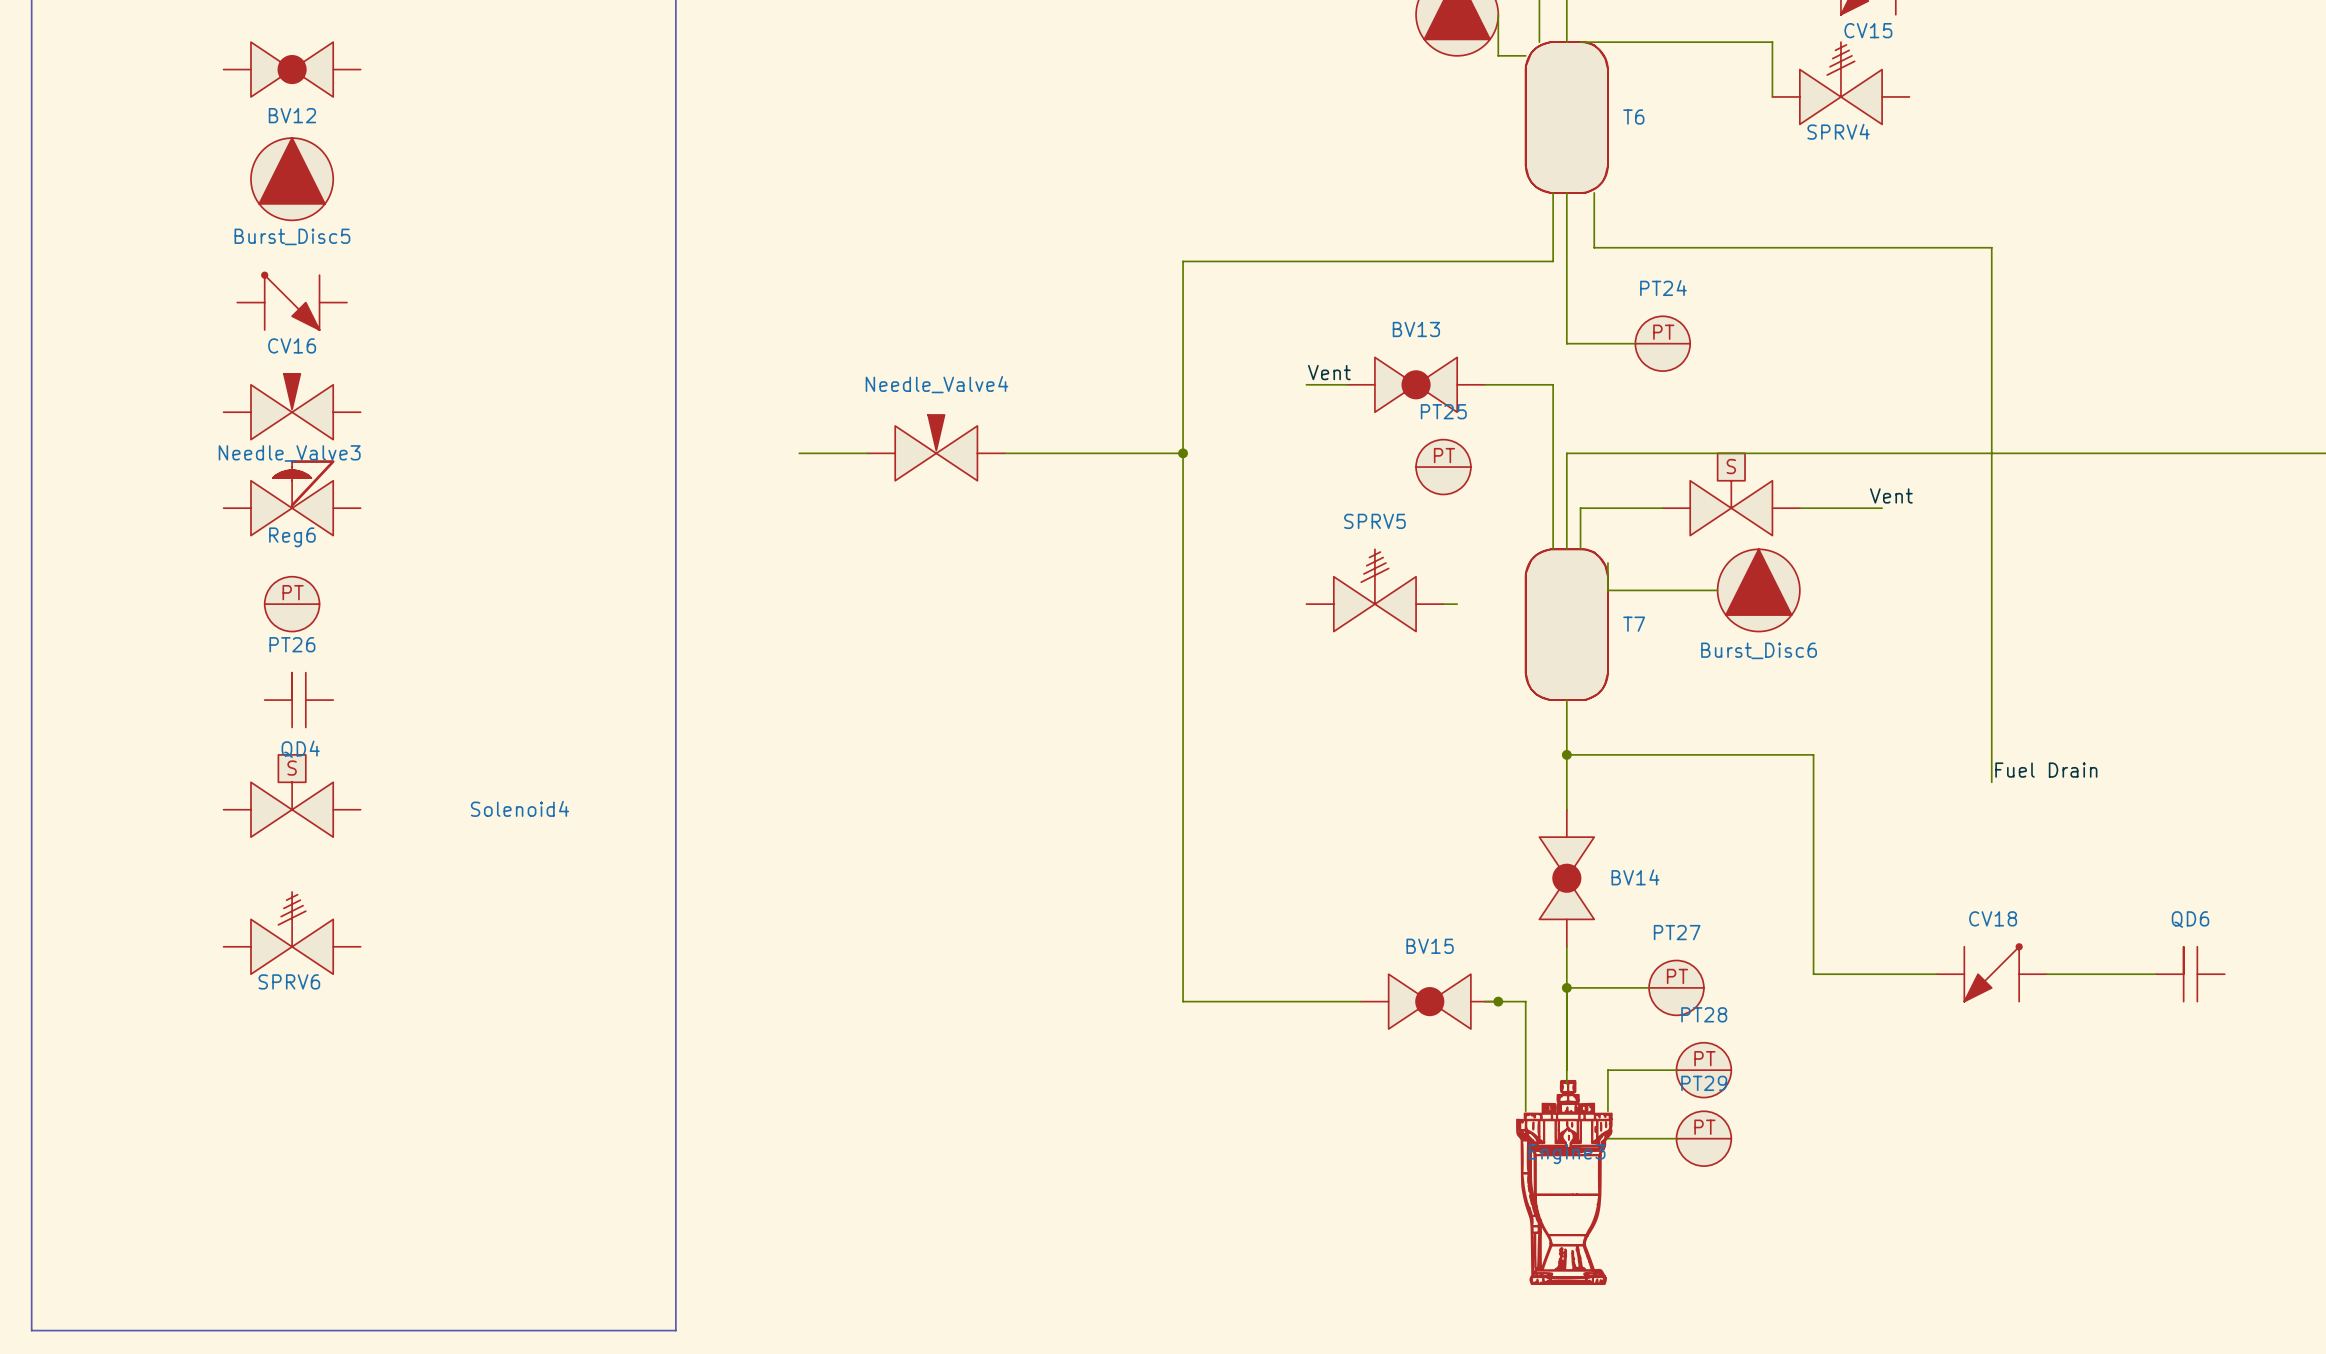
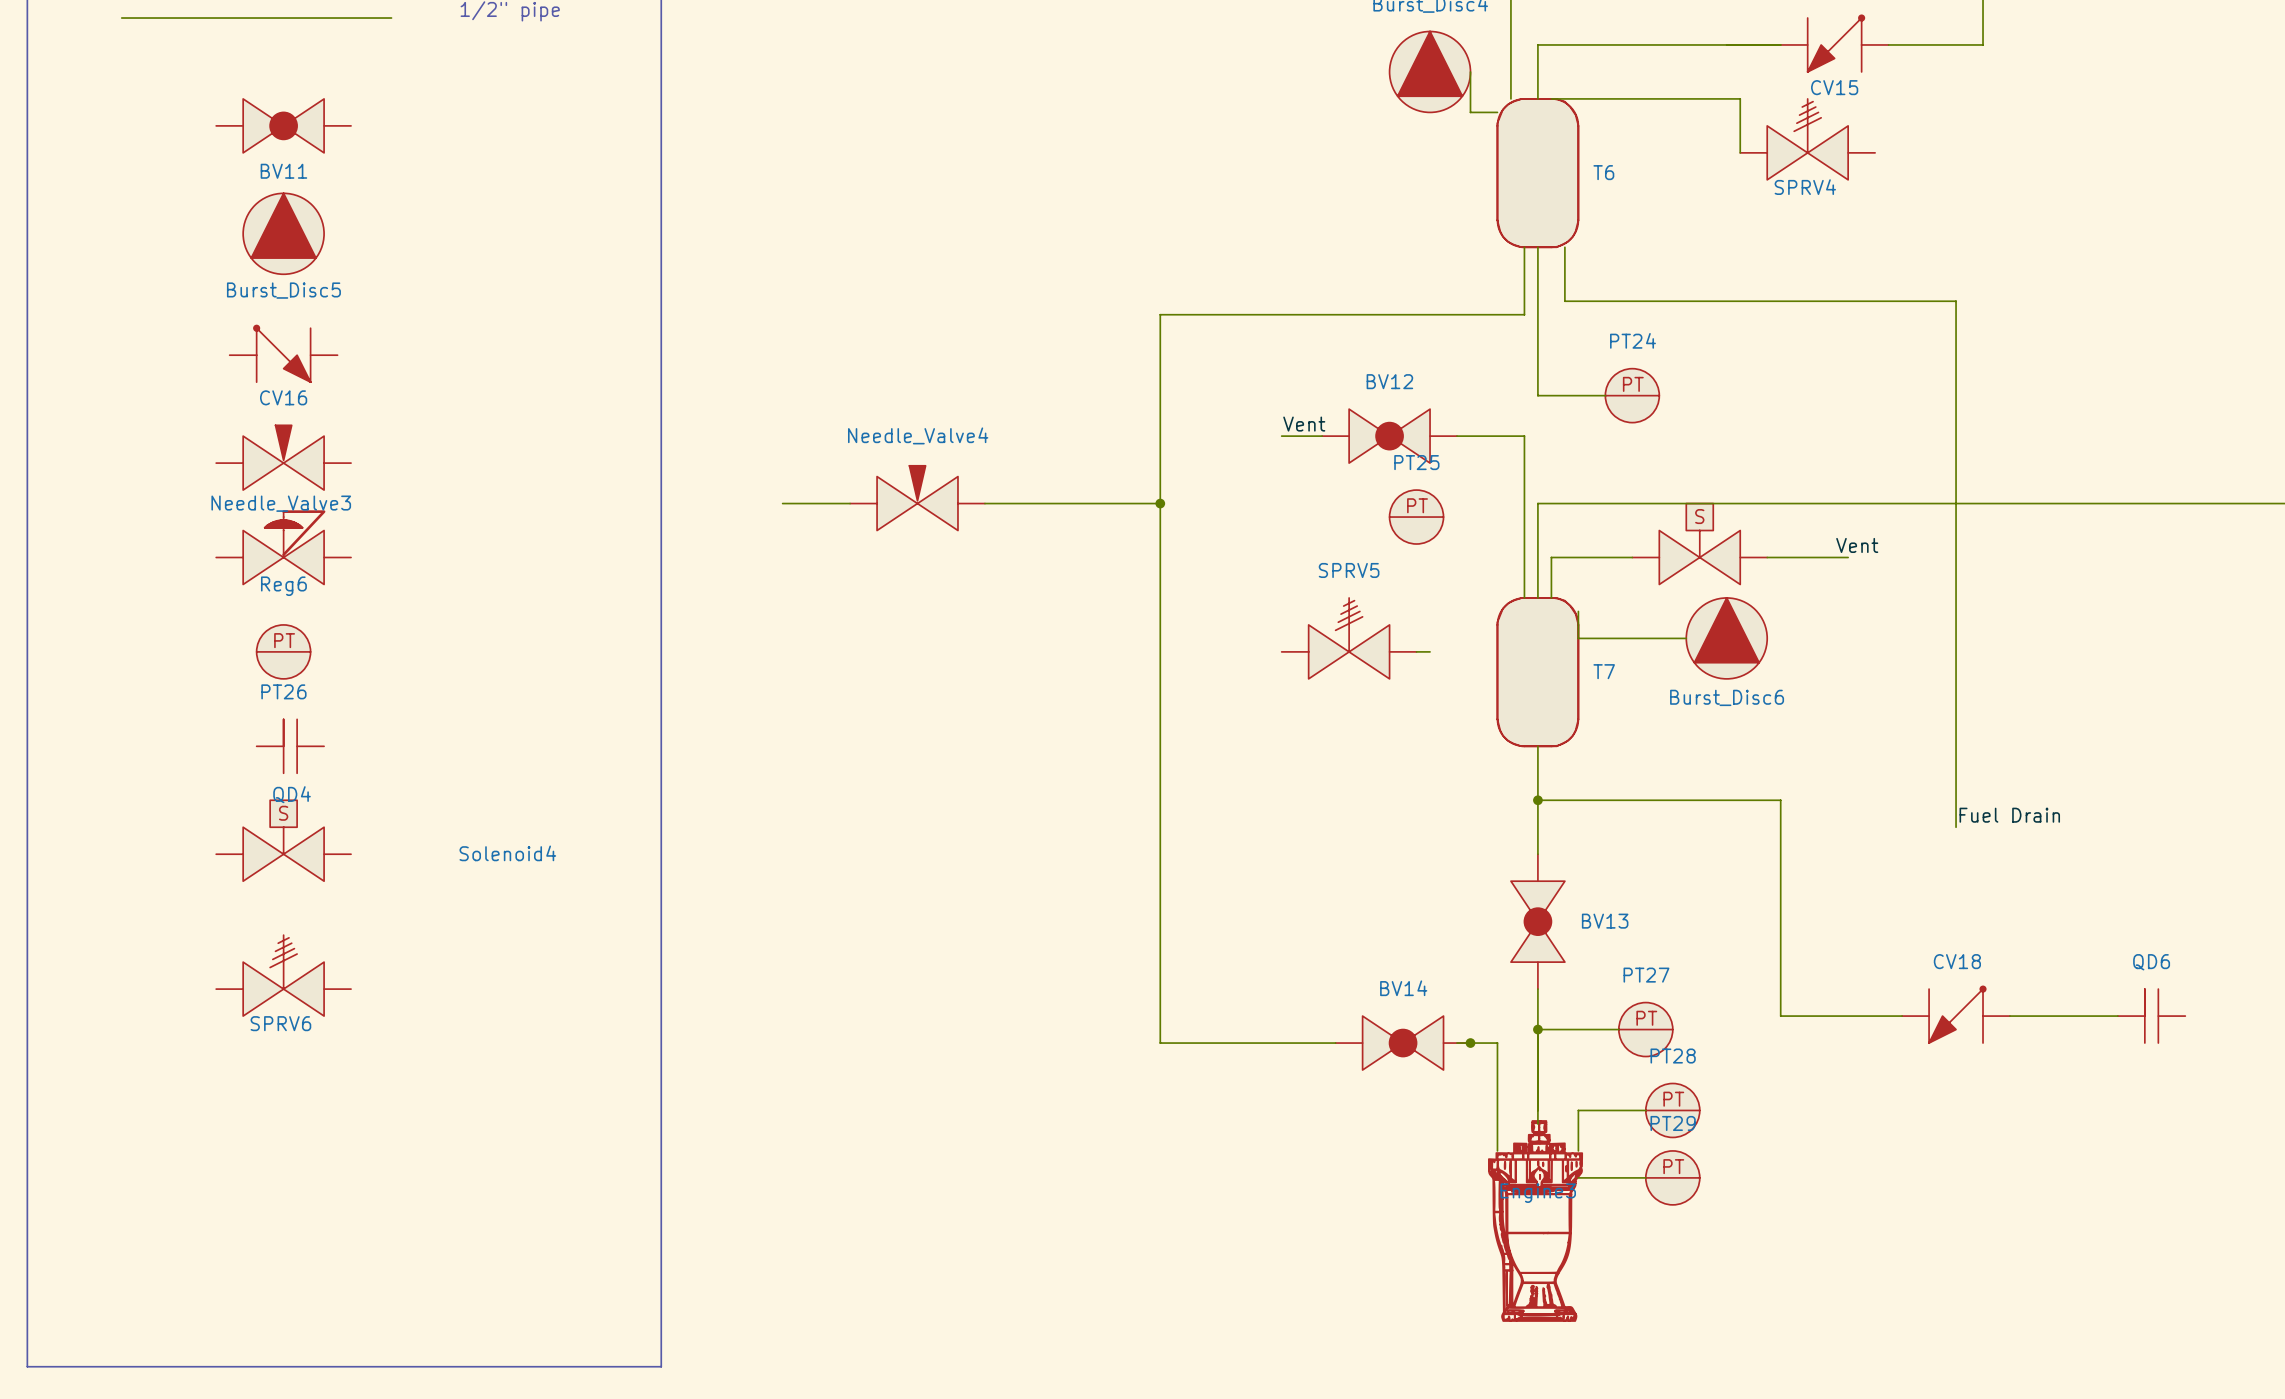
BV12 name: BV12 (292, 115) -> BV11 (283, 171)
BV13 name: BV13 (1416, 329) -> BV12 (1389, 381)
BV14 name: BV14 (1635, 877) -> BV13 (1605, 921)
BV15 name: BV15 (1430, 946) -> BV14 (1403, 988)

